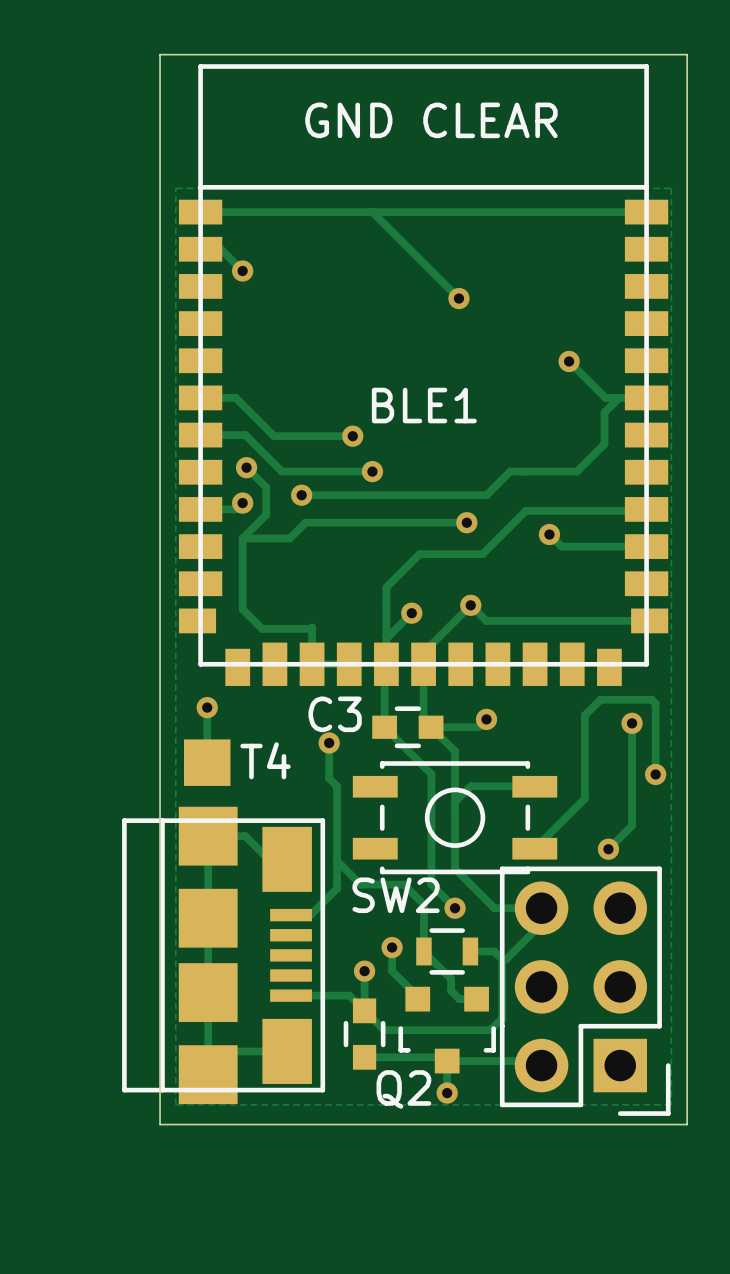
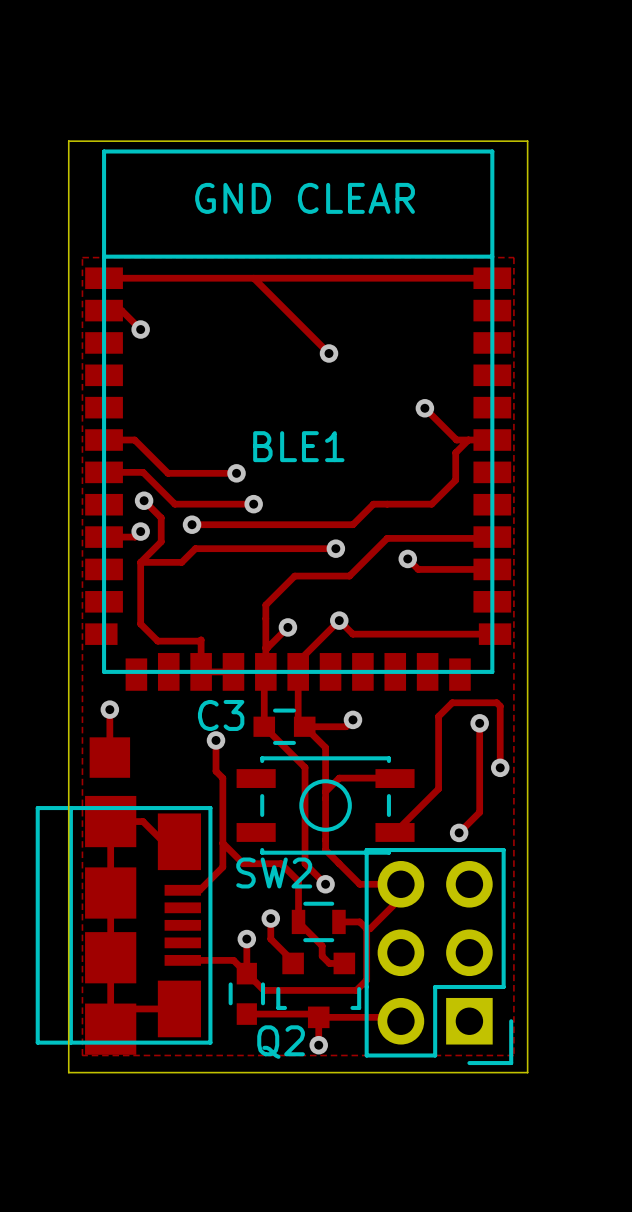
T4 name: T4 (265, 760) -> none

